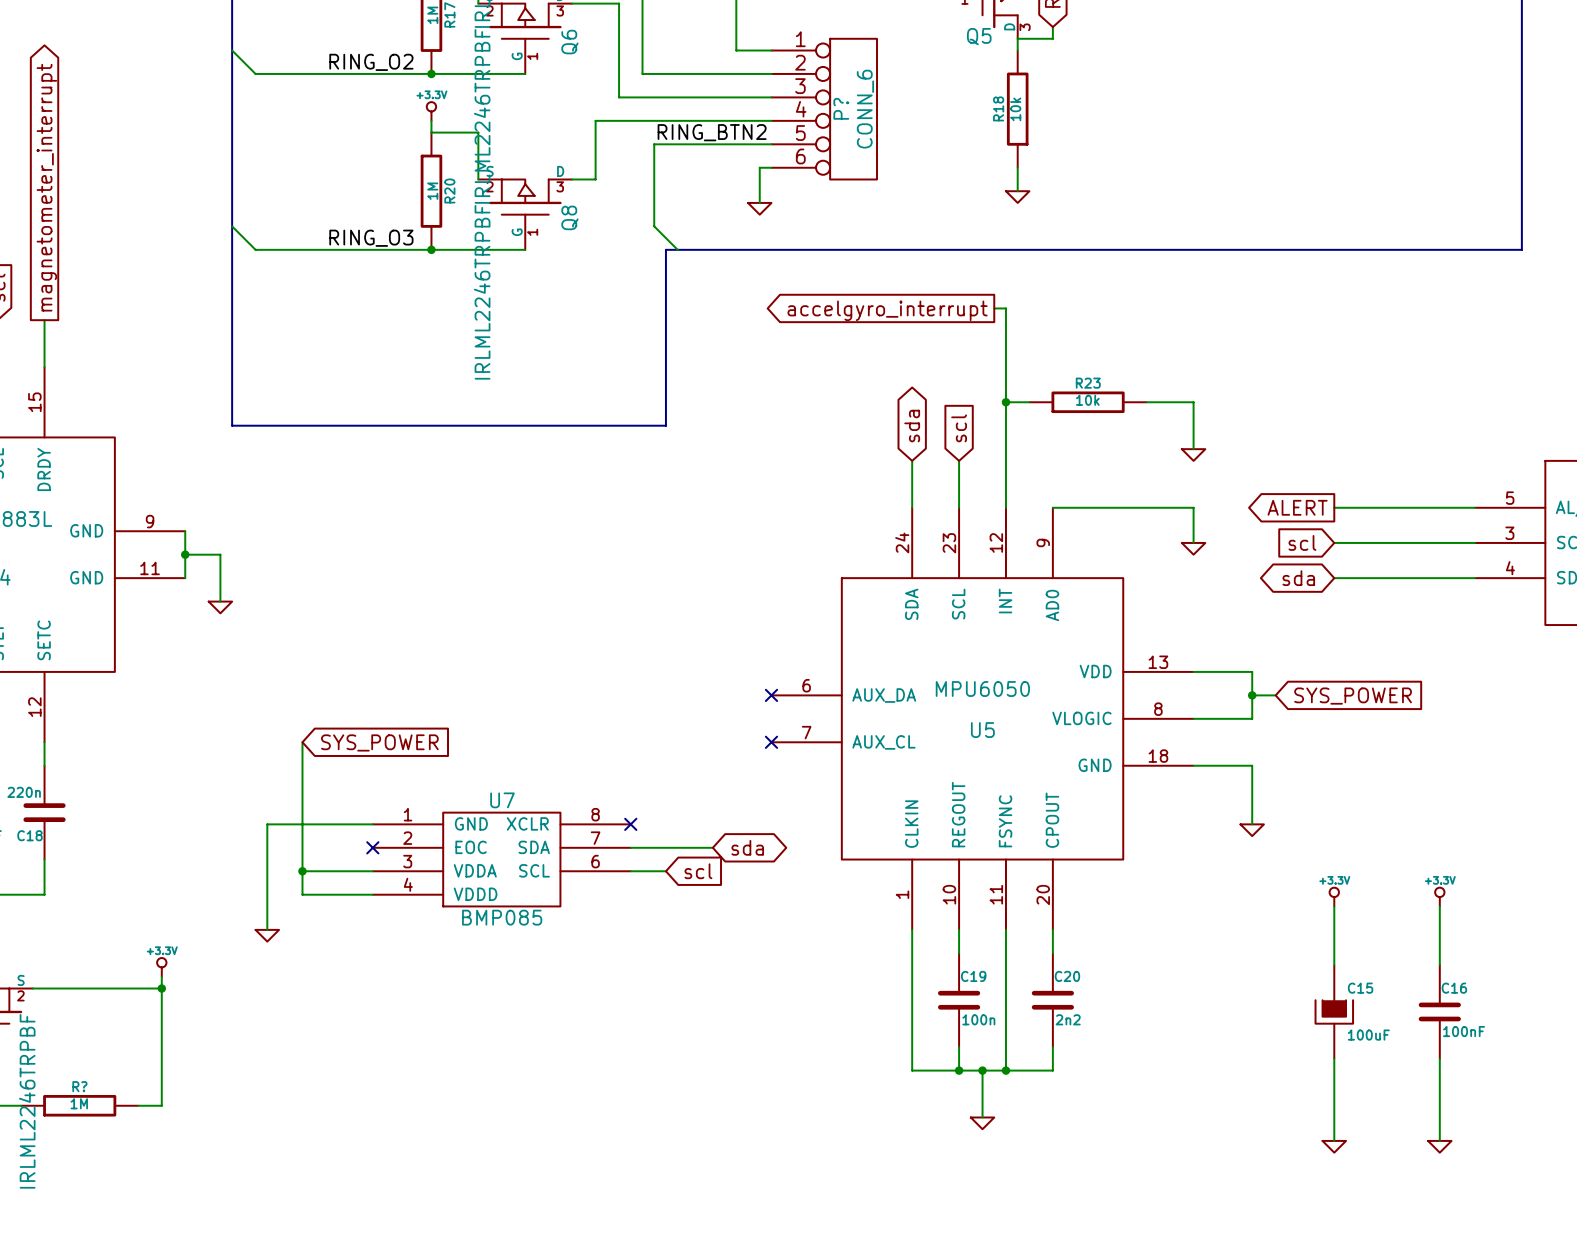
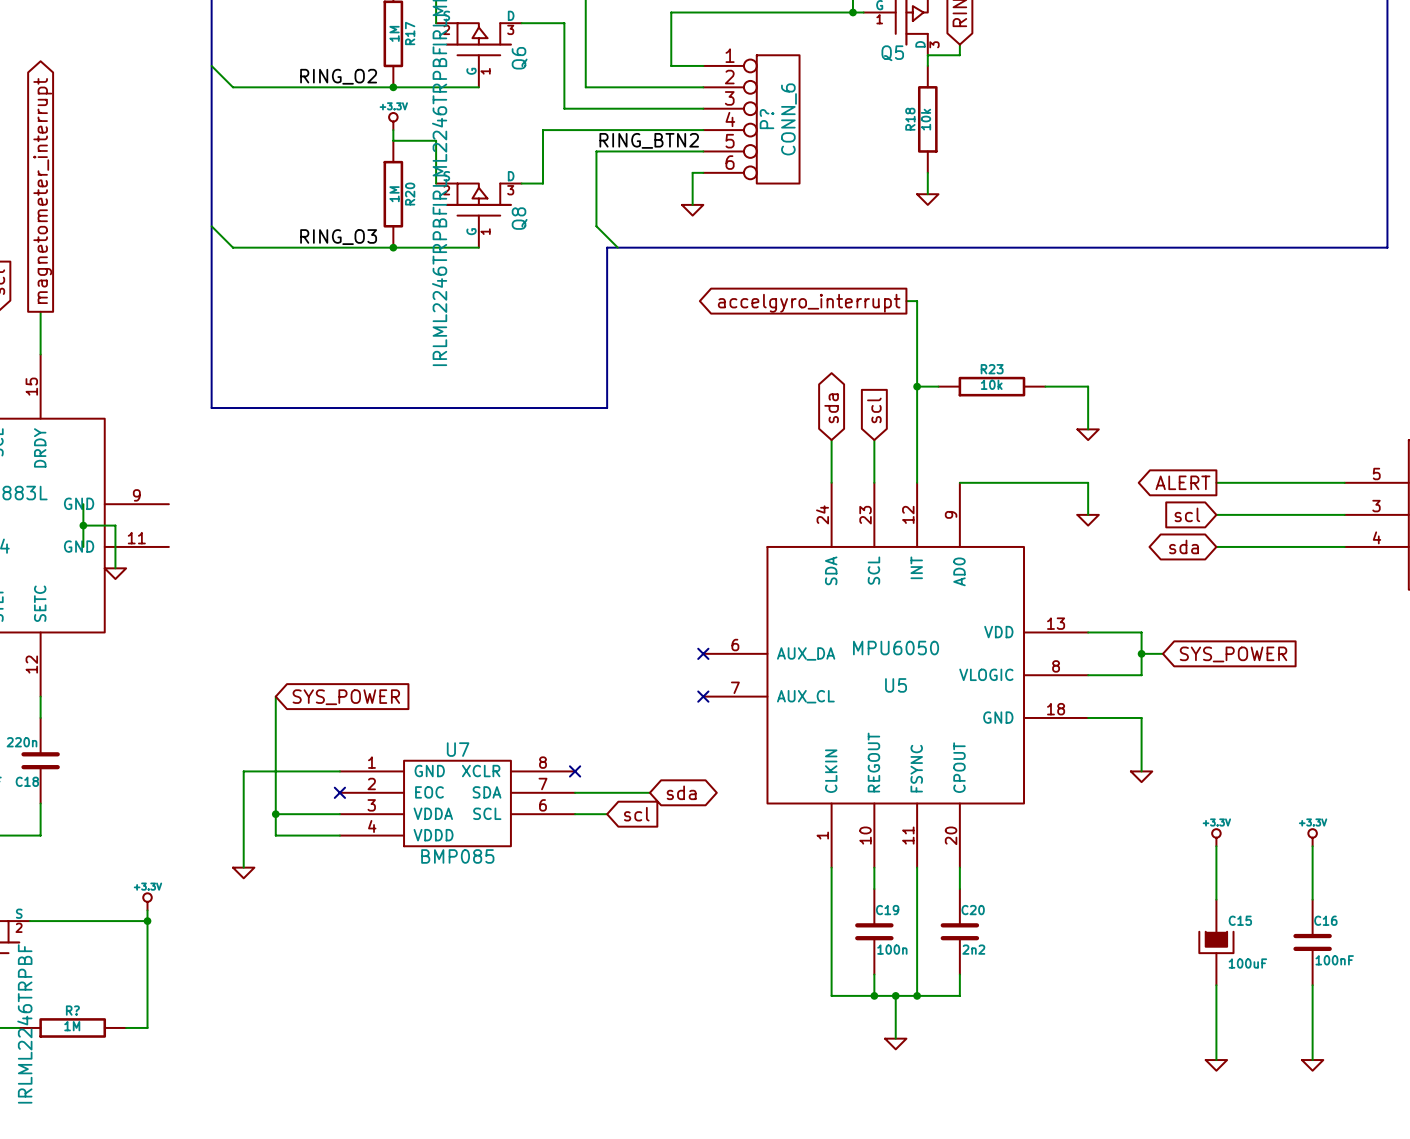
wire: (185, 531) (185, 578) -> (83, 504) (83, 546)
junction: none -> (83, 525)
wire: (185, 554) (220, 554) (220, 601) -> (83, 525) (115, 525) (115, 568)
junction: (185, 554) -> none
power symbol position: (220, 607) -> (115, 573)

